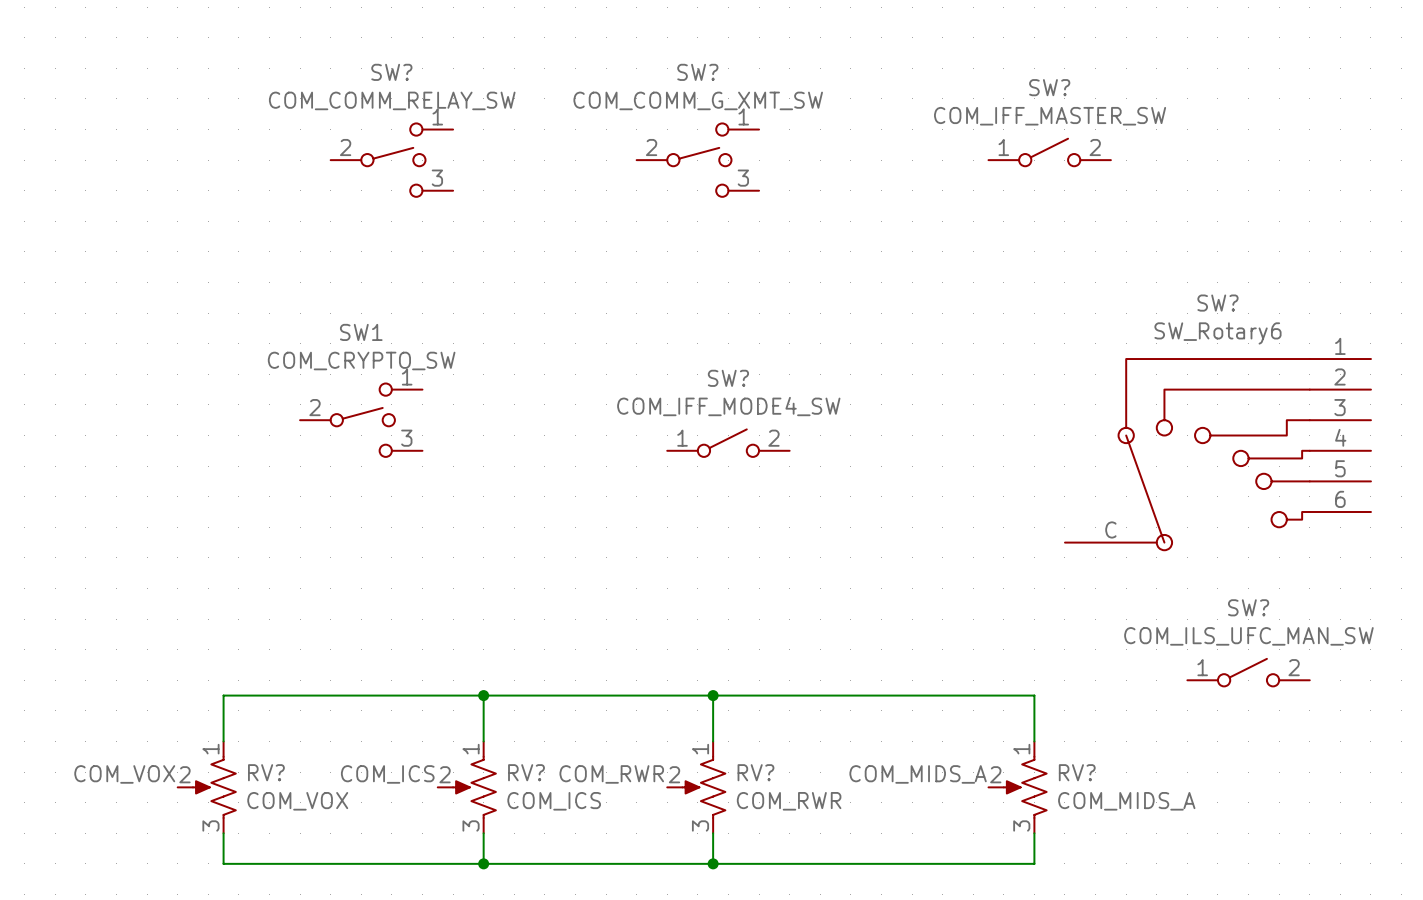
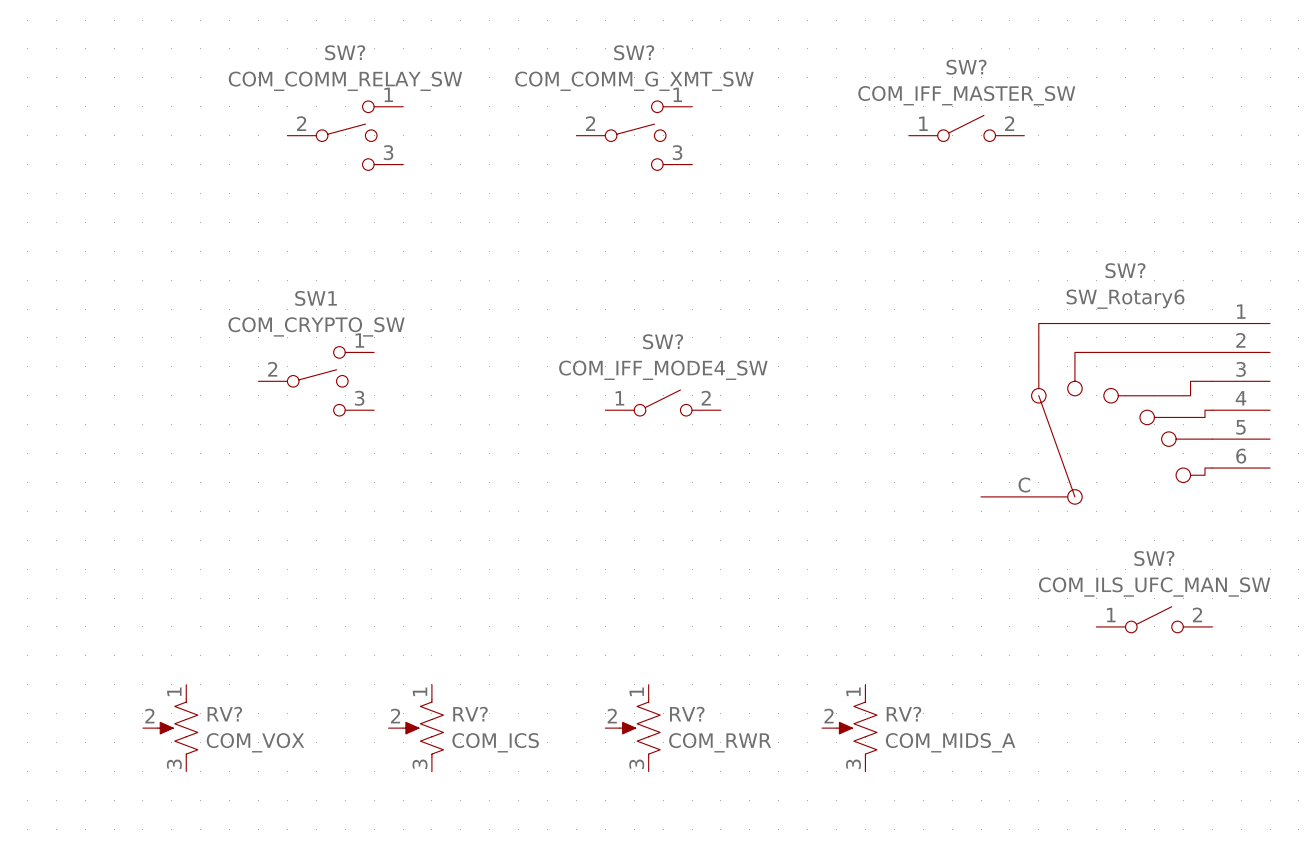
wire: (483, 695) (483, 741) -> none
junction: (483, 695) -> none
wire: (713, 695) (713, 741) -> none
junction: (713, 695) -> none
wire: (223, 741) (223, 695) (1034, 695) (1034, 741) -> none
label: COM_VOX (124, 774) -> none
label: COM_ICS (387, 774) -> none
label: COM_RWR (611, 774) -> none
label: COM_MIDS_A (918, 774) -> none
RV? position: (1017, 787) -> (849, 728)
wire: (223, 833) (223, 863) (1034, 863) (1034, 833) -> none
wire: (483, 833) (483, 863) -> none
wire: (713, 833) (713, 863) -> none
junction: (483, 863) -> none
junction: (713, 863) -> none

